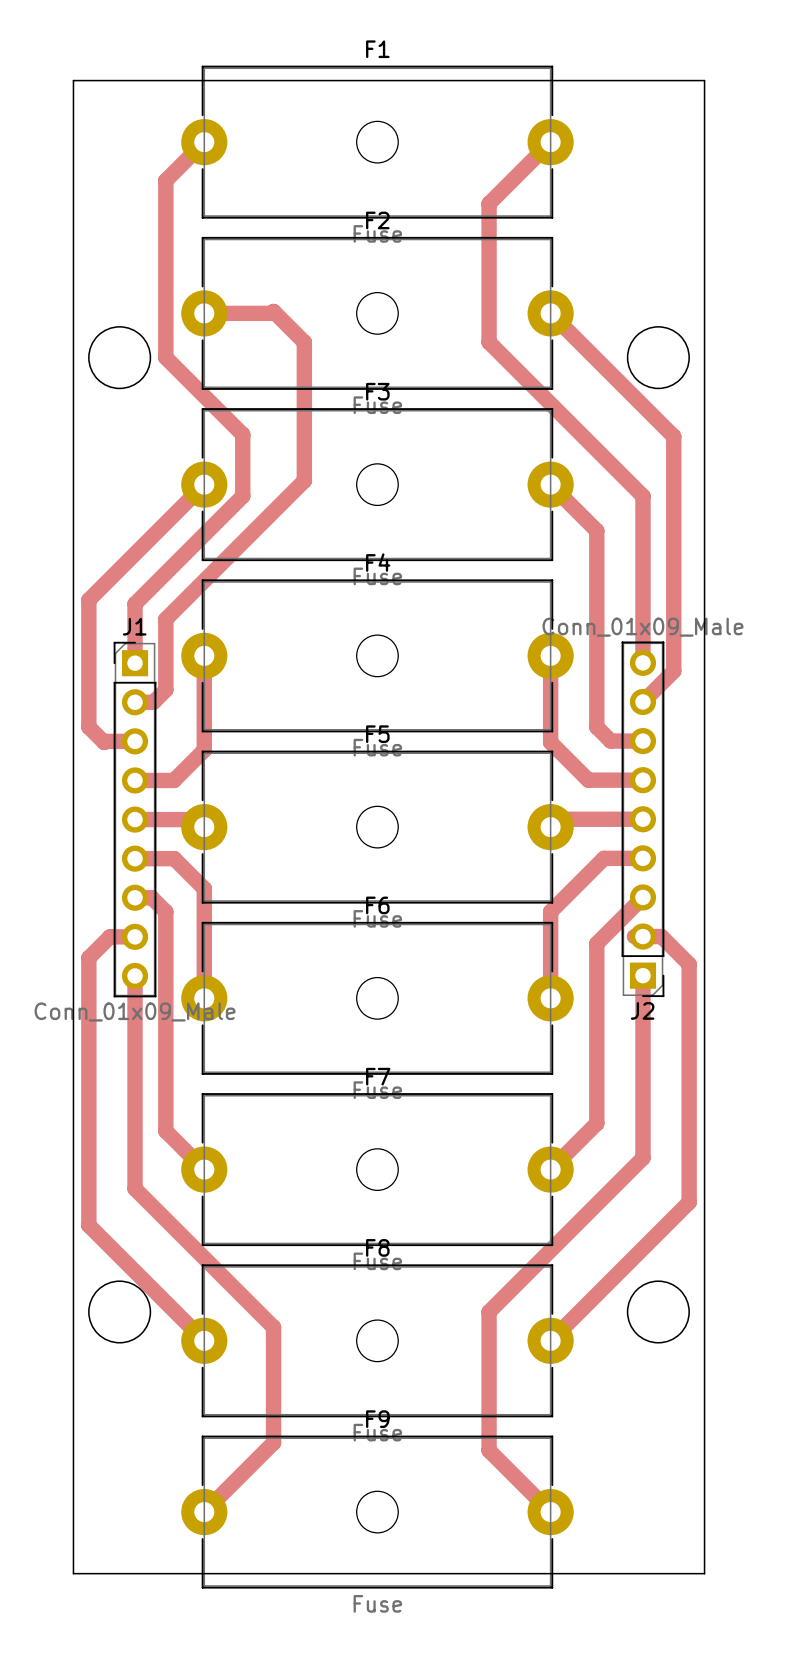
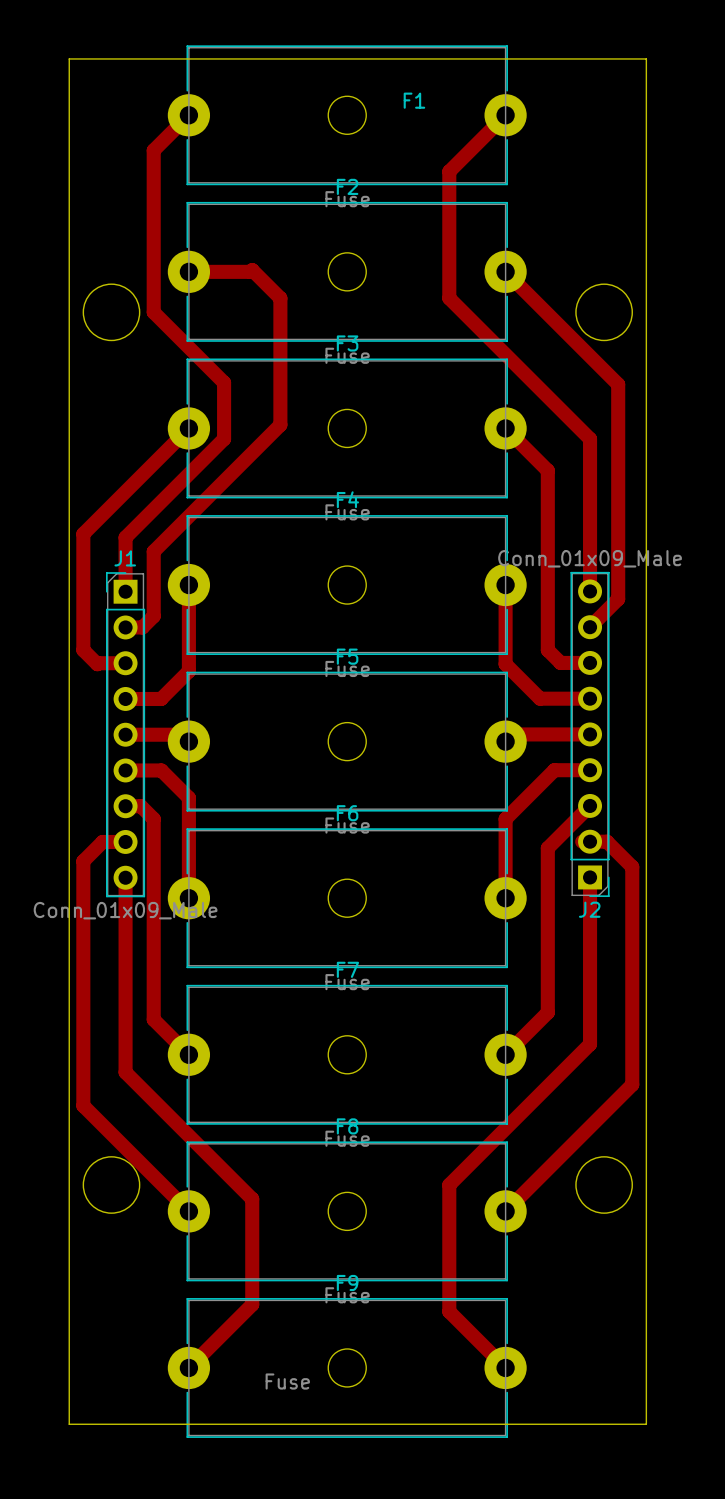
F1 name position: F1 (377, 49) -> F1 (414, 100)
F9 value position: Fuse (377, 1603) -> Fuse (287, 1381)

